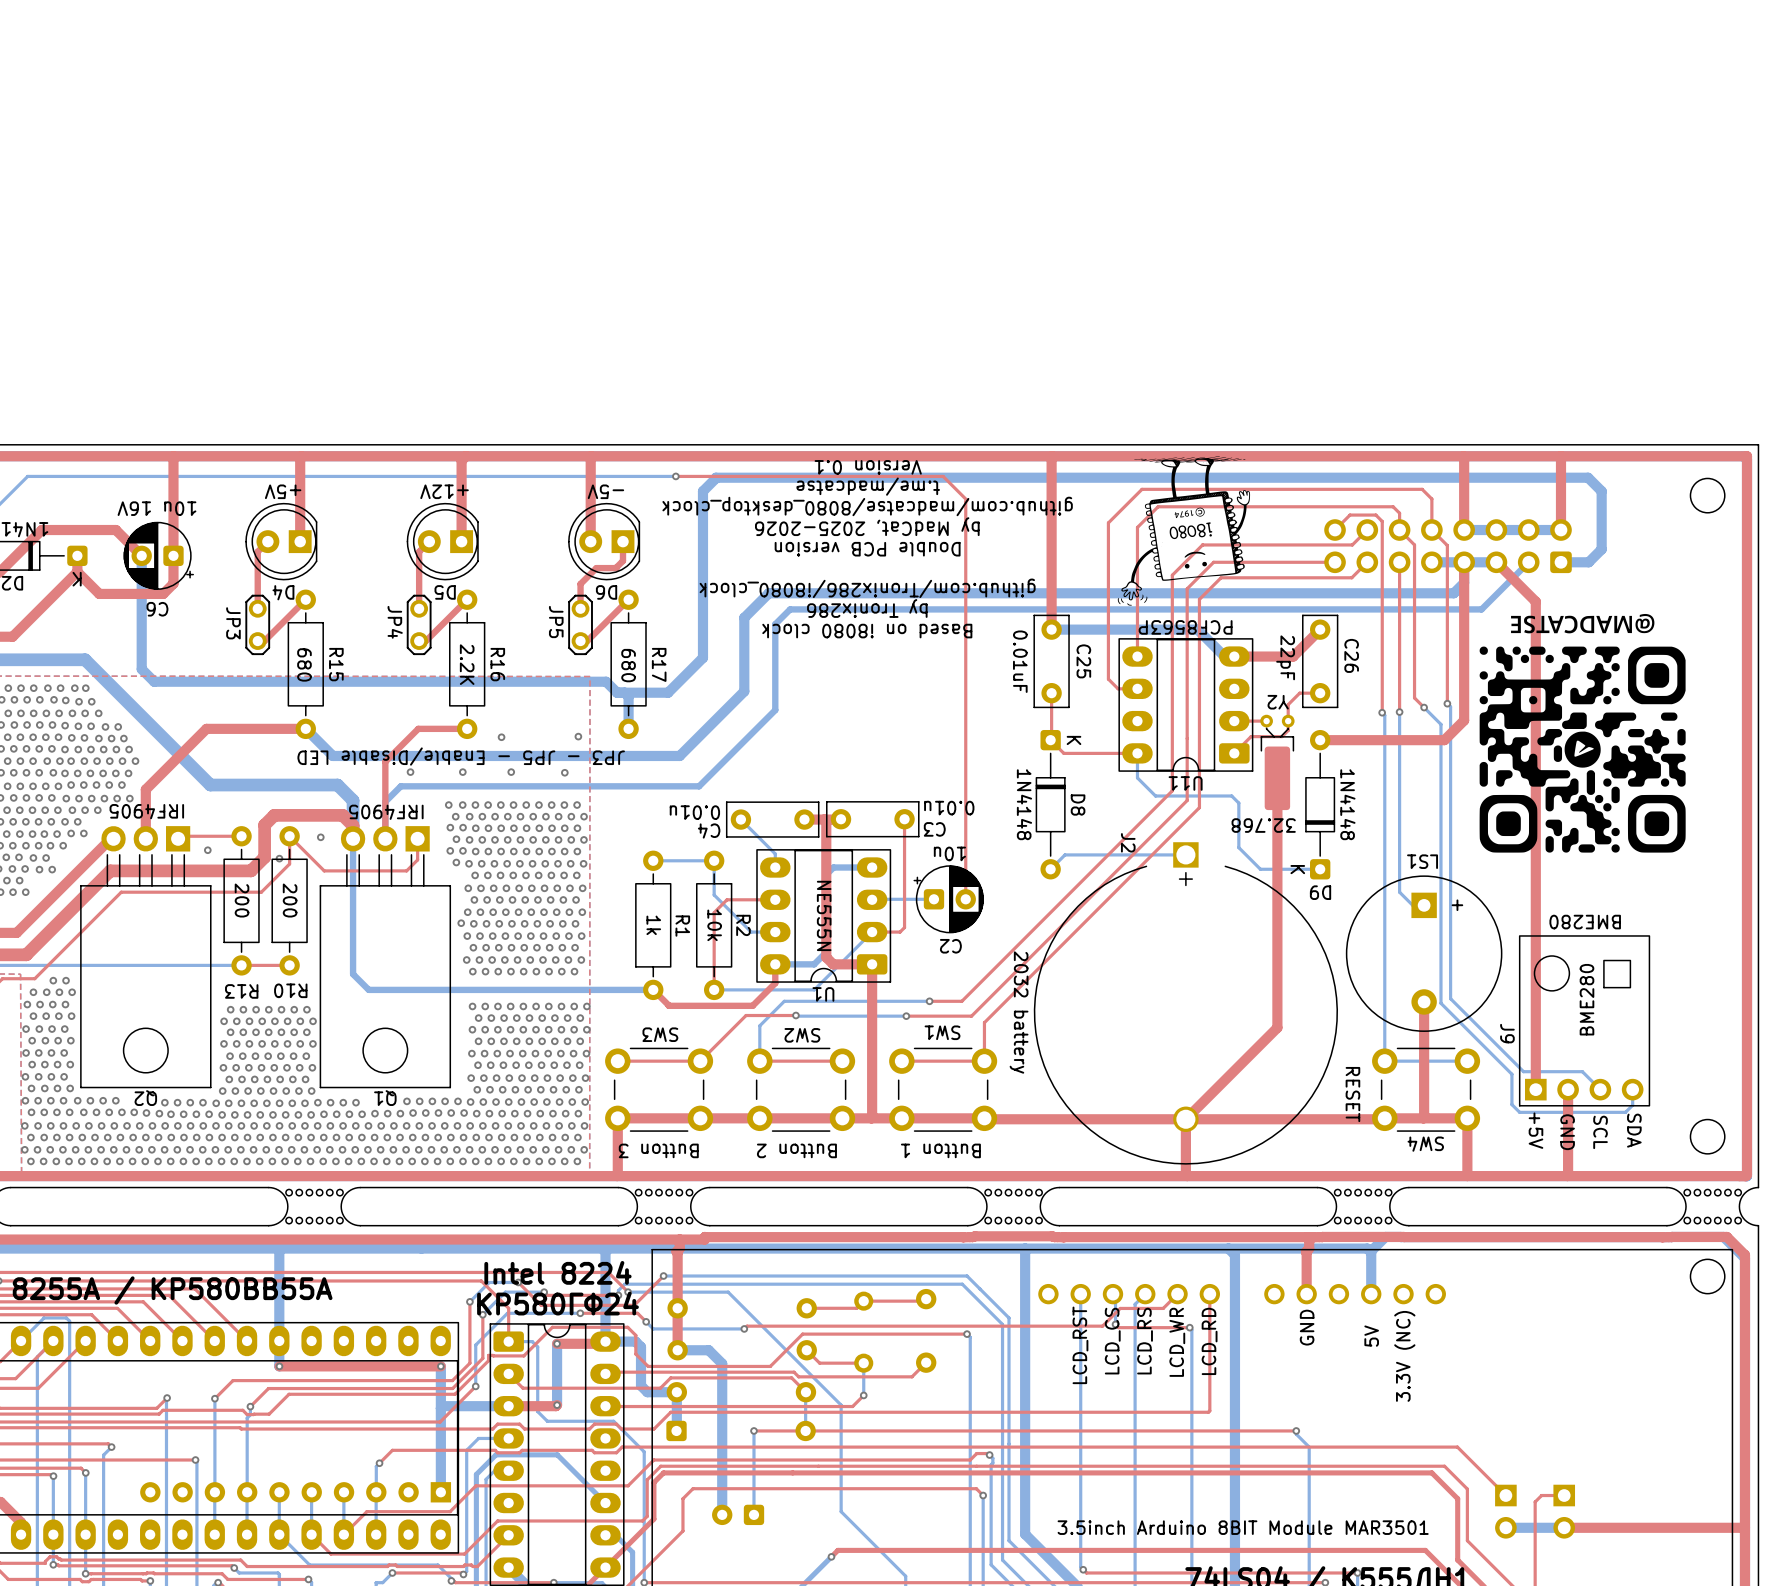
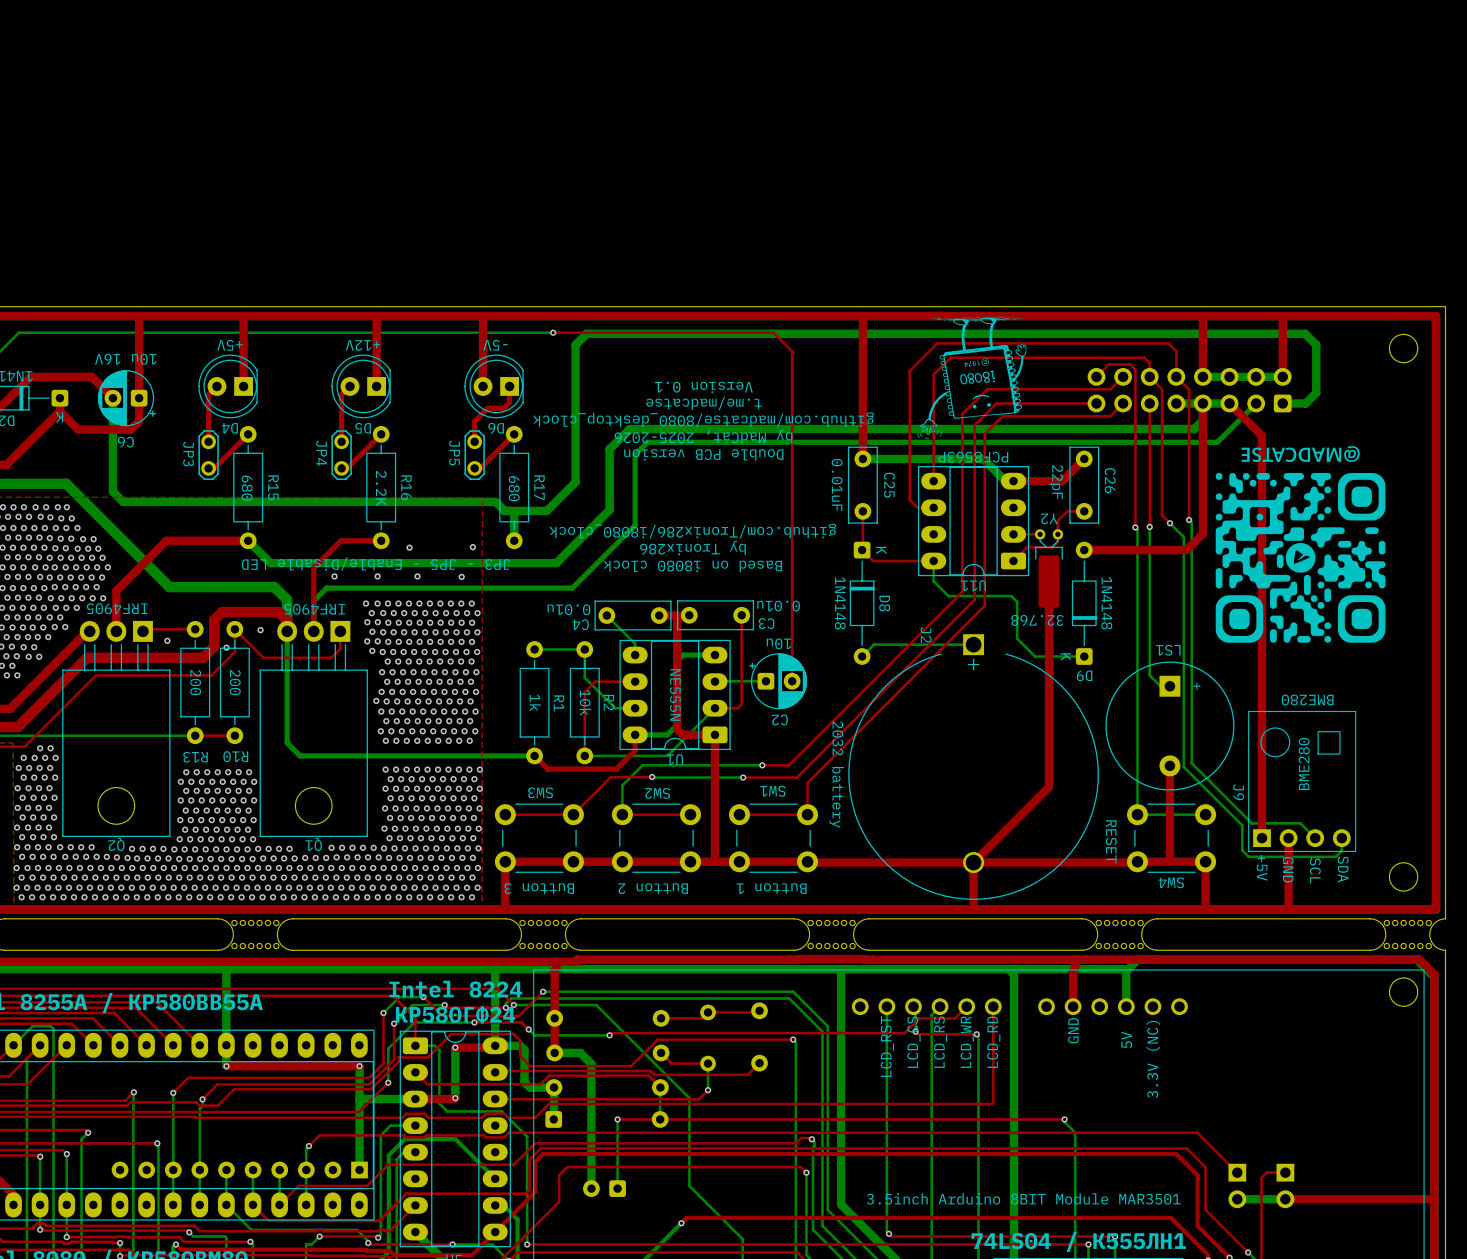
text position: Version 0.1 (868, 467) -> Version 0.1 (703, 387)
text position: t.me/madcatse (868, 486) -> t.me/madcatse (704, 403)
text position: github.com/madcatse/8080_desktop_clock (867, 506) -> github.com/madcatse/8080_desktop_clock (703, 419)
text position: by MadCat, 2025-2026 (867, 526) -> by MadCat, 2025-2026 (703, 436)
text position: Double PCB version (867, 549) -> Double PCB version (703, 454)
text position: github.com/Tronix286/i8080_clock (867, 588) -> github.com/Tronix286/i8080_clock (692, 531)
text position: by Tronix286 (867, 608) -> by Tronix286 (692, 548)
text position: Based on i8080 clock (867, 631) -> Based on i8080 clock (692, 566)

